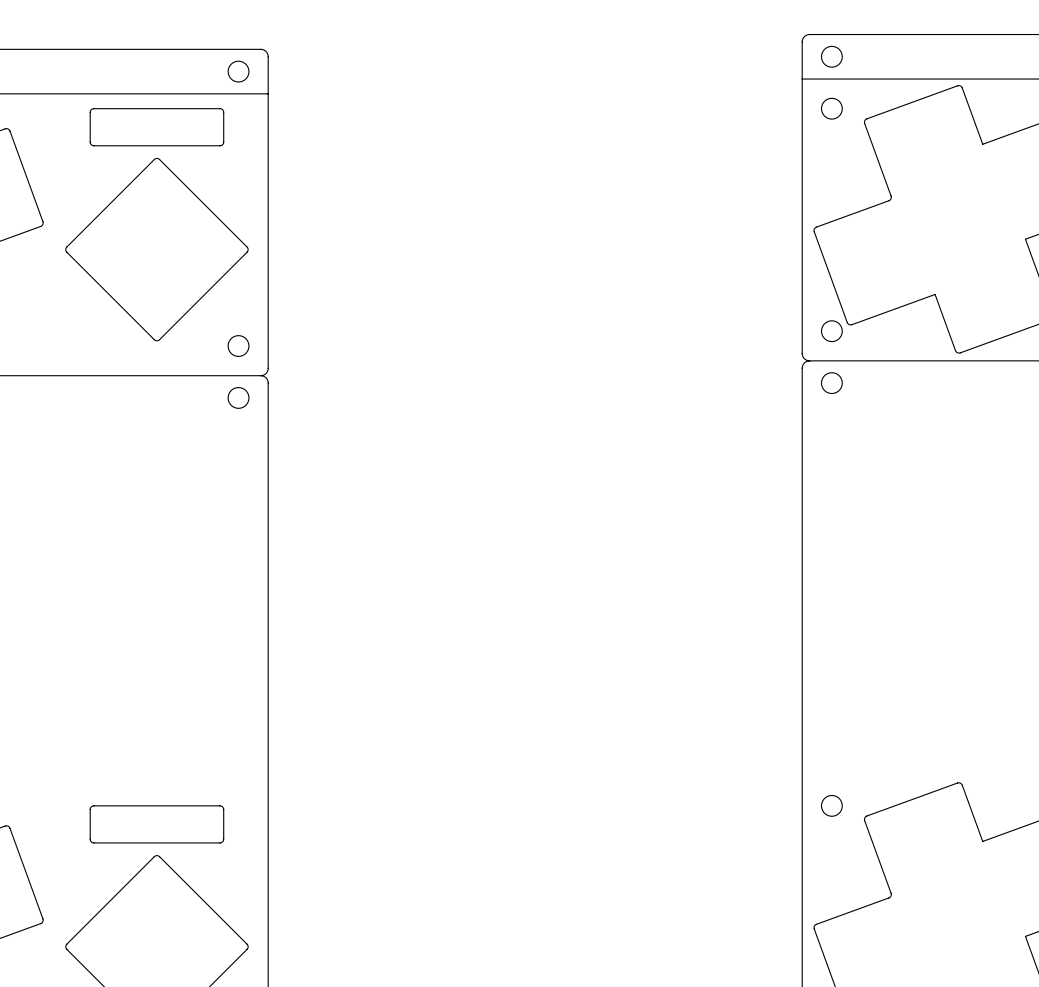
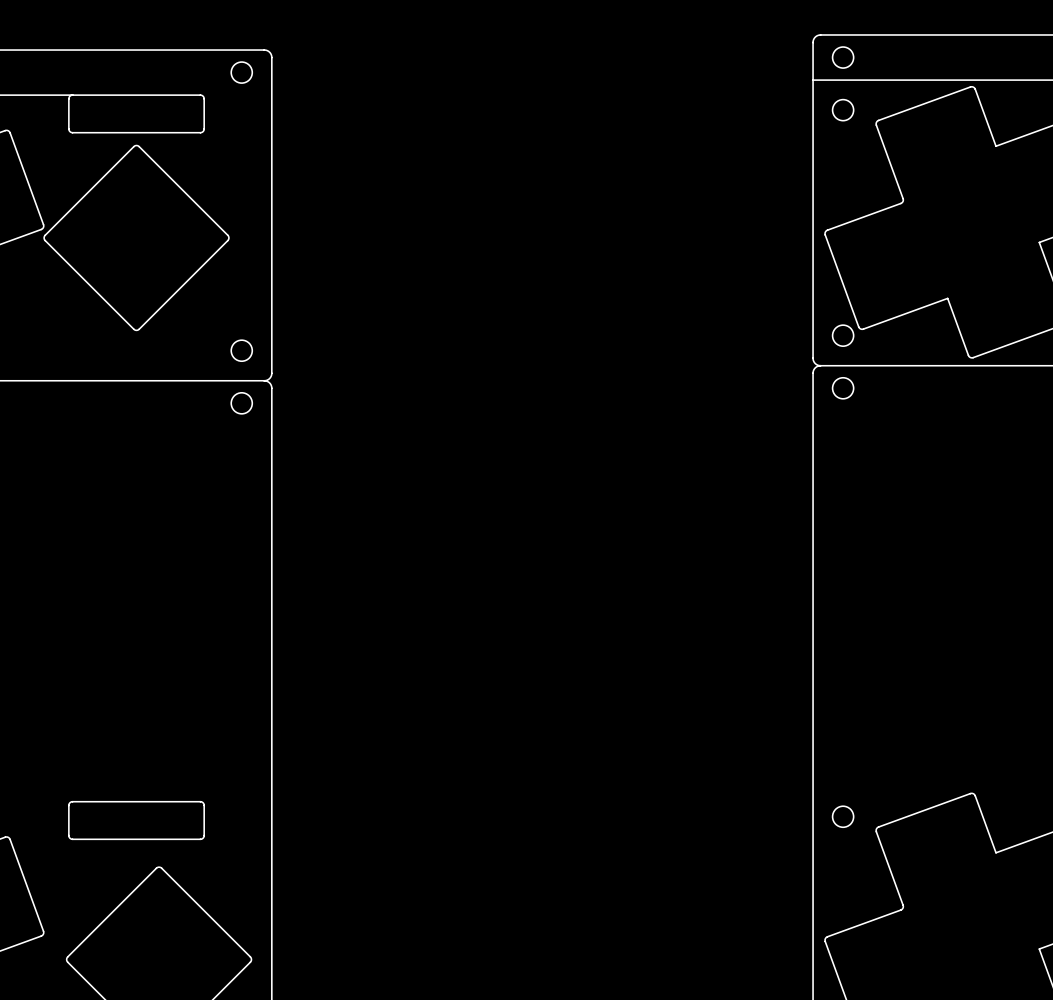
board edge: (268, 93) (197, 93) -> (72, 95) (68, 98) (68, 129) (72, 132) (201, 132) (204, 129) (204, 98) (200, 95)
board edge: (219, 108) (92, 108) (90, 111) (90, 143) (93, 145) (220, 145) (223, 142) (223, 112) (219, 108) -> none
board edge: (159, 159) (248, 249) (156, 340) (65, 249) (154, 159) (159, 159) -> (139, 146) (228, 237) (136, 330) (44, 237) (133, 146) (139, 146)
board edge: (219, 805) (92, 806) (90, 809) (90, 840) (93, 842) (220, 842) (223, 839) (223, 809) (219, 805) -> (200, 801) (71, 801) (68, 804) (68, 836) (72, 839) (201, 839) (204, 836) (204, 805) (200, 801)

